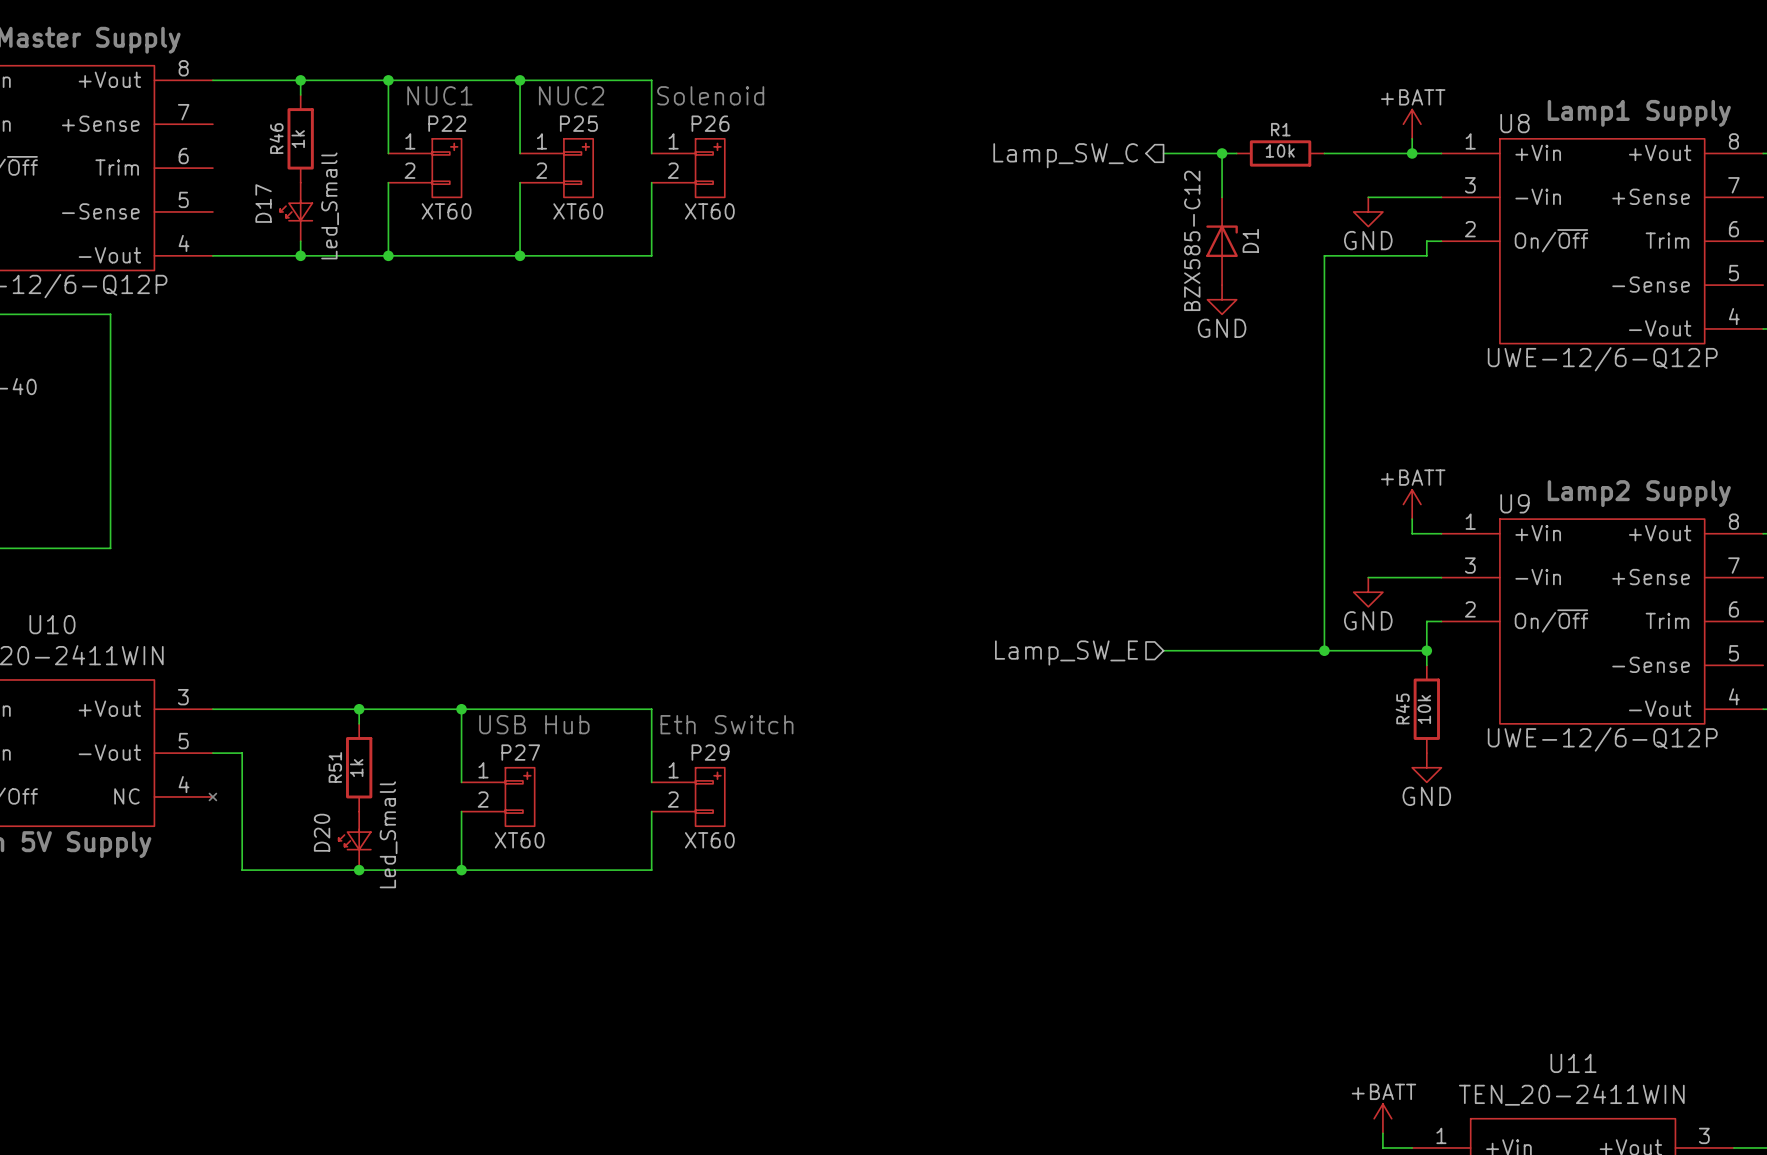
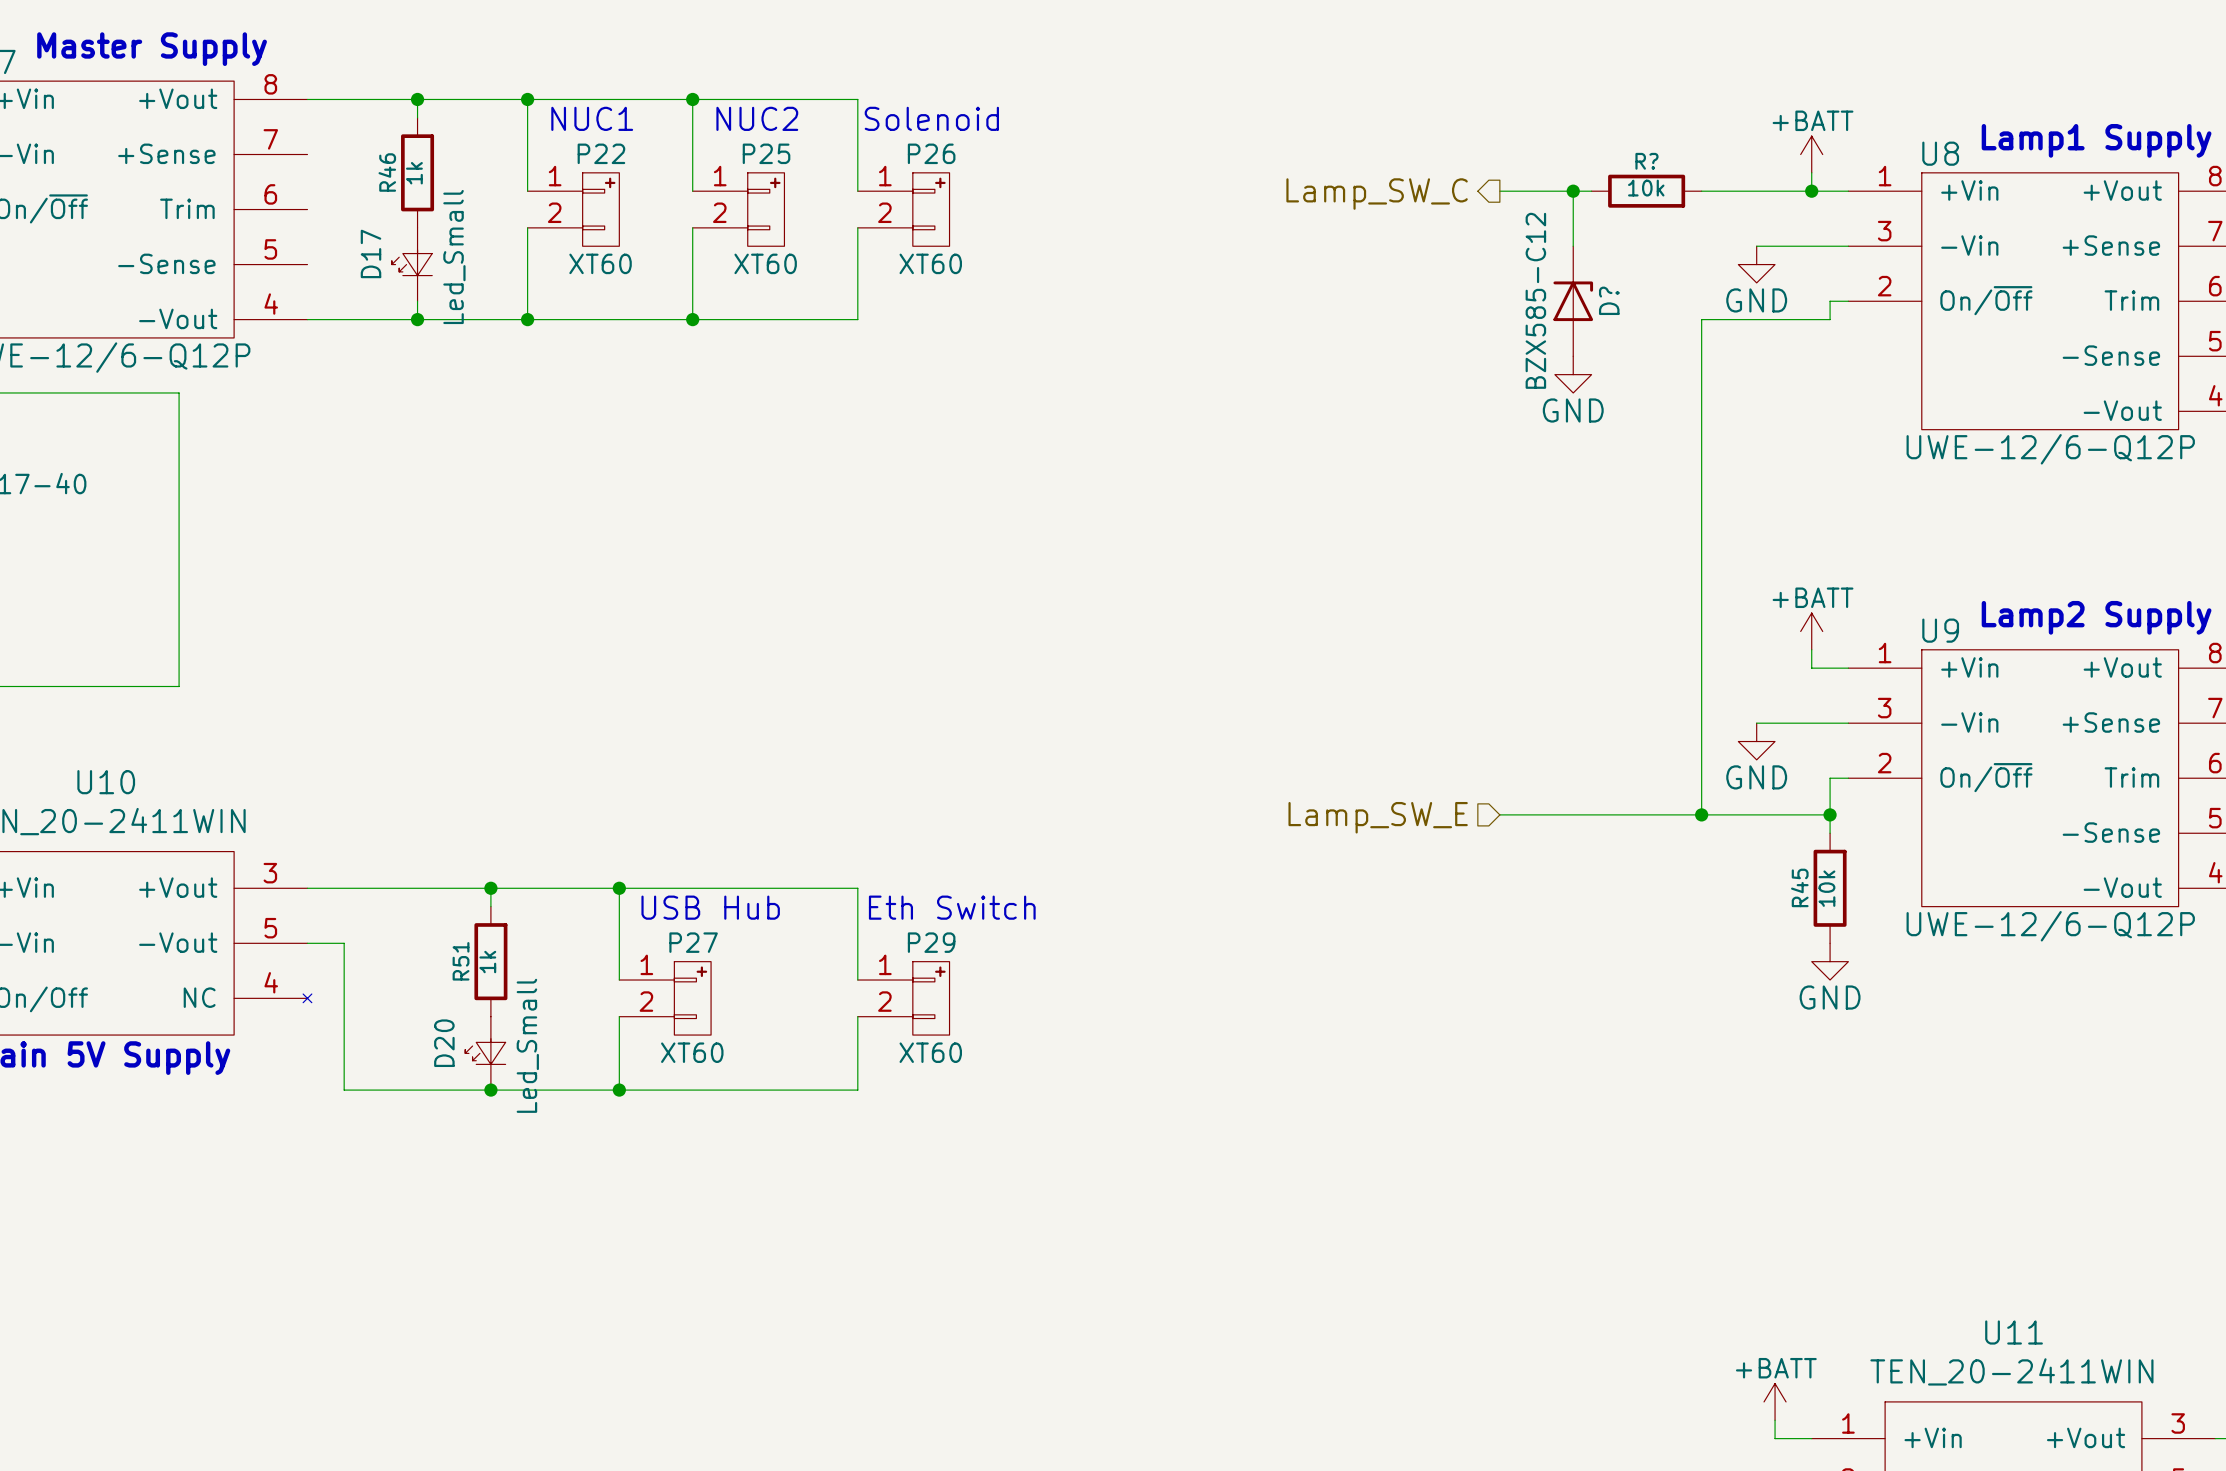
R1 name: R1 (1280, 129) -> R? (1646, 161)
D1 name: D1 (1250, 240) -> D? (1609, 300)

